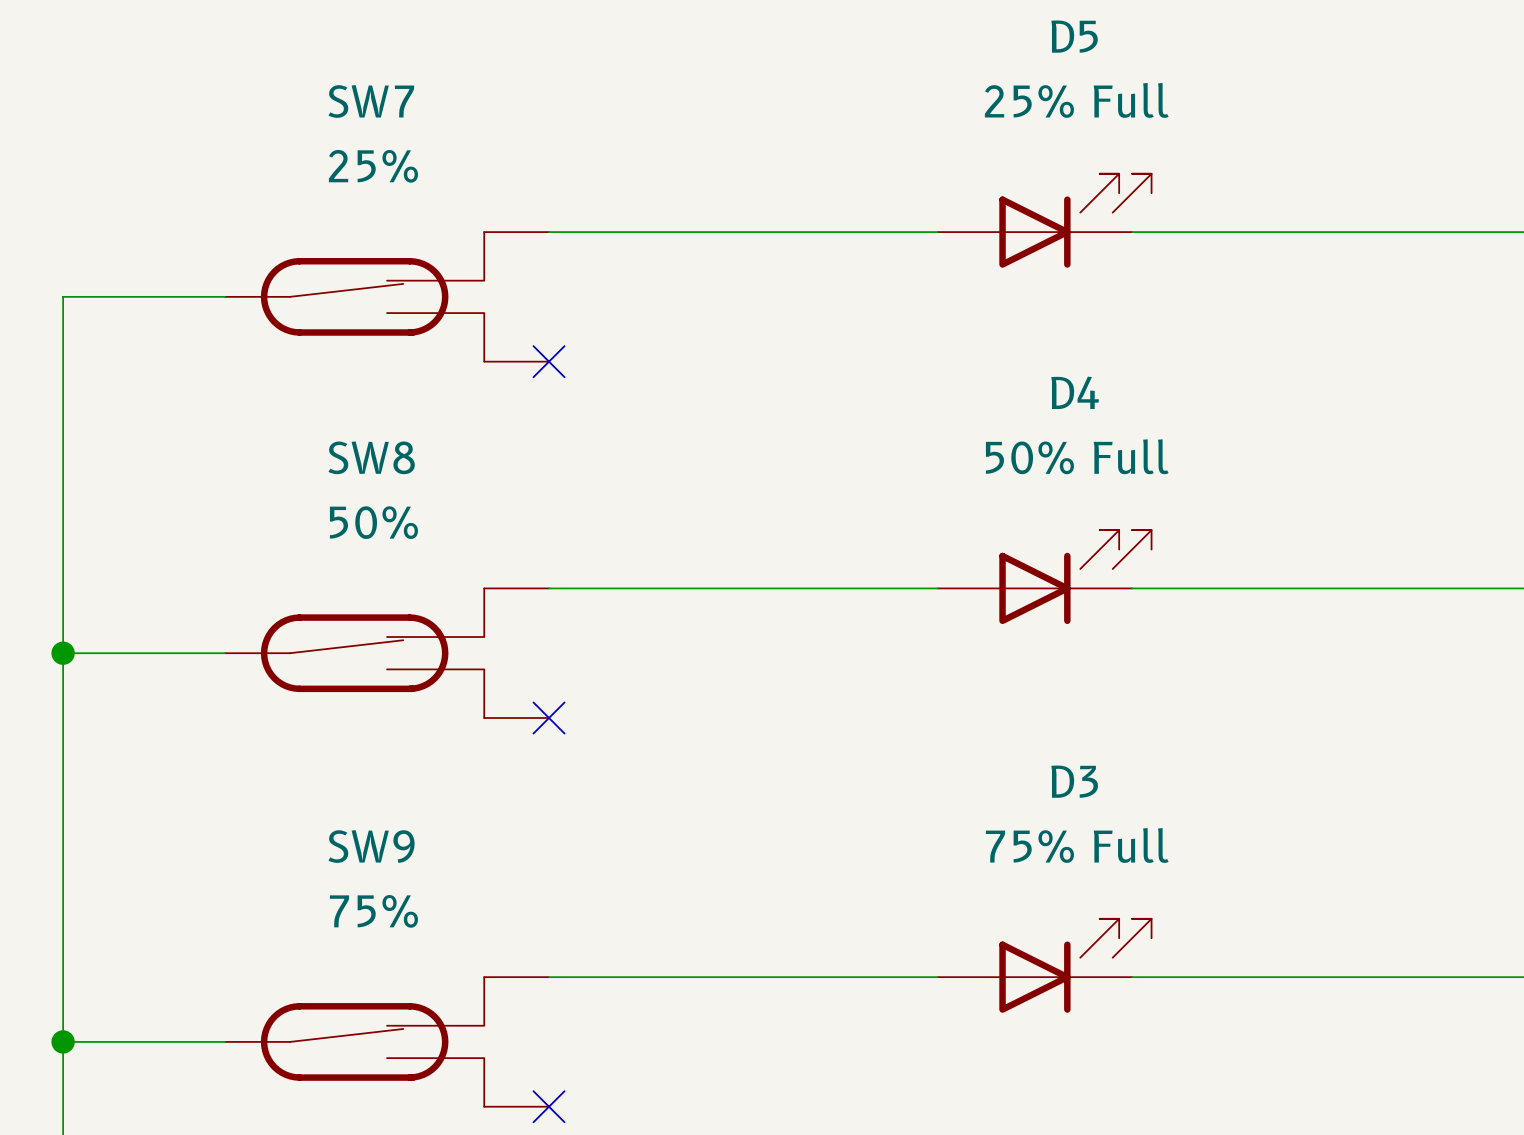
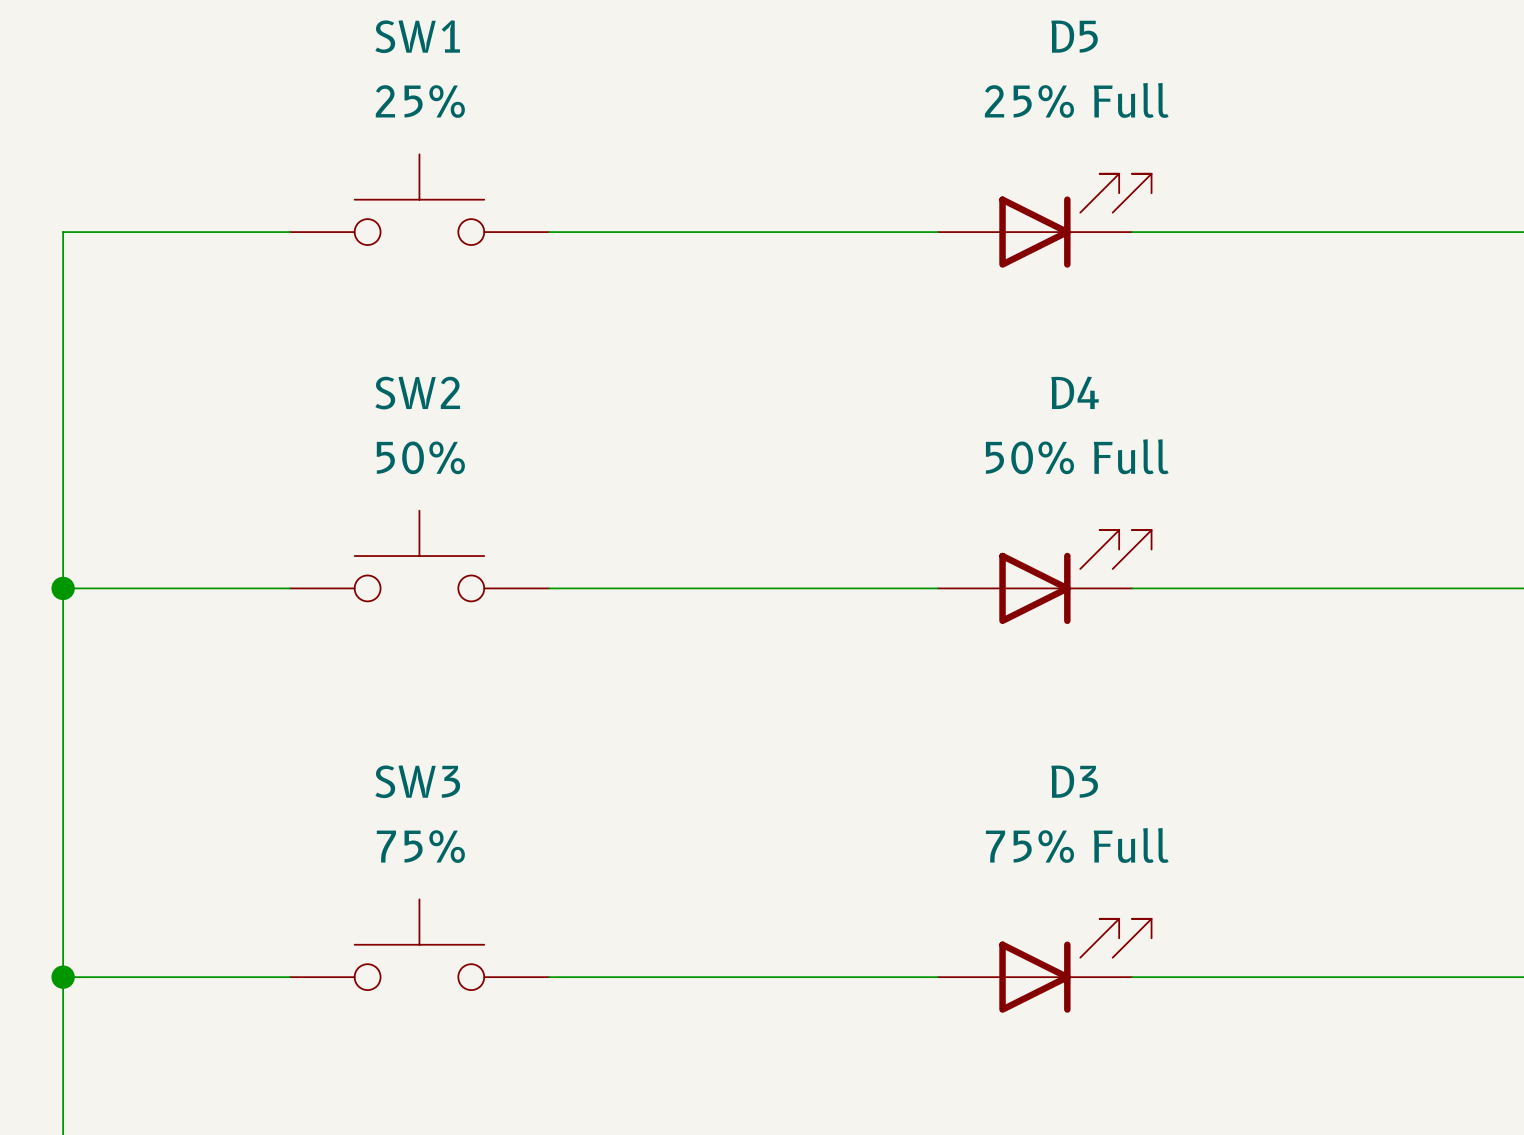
SW1: none -> 25% (419, 199)
wire: (63, 296) (225, 296) -> (63, 296) (63, 232) (289, 232)
SW7: 25% (387, 296) -> none
no-connect mark: (549, 361) -> none
SW2: none -> 50% (419, 556)
wire: none -> (63, 588) (289, 588)
wire: (63, 653) (225, 653) -> none
junction position: (63, 653) -> (63, 588)
SW8: 50% (387, 653) -> none
no-connect mark: (549, 717) -> none
SW3: none -> 75% (419, 944)
wire: none -> (63, 977) (289, 977)
wire: (63, 1041) (225, 1041) -> none
junction position: (63, 1041) -> (63, 977)
SW9: 75% (387, 1041) -> none
no-connect mark: (549, 1106) -> none

